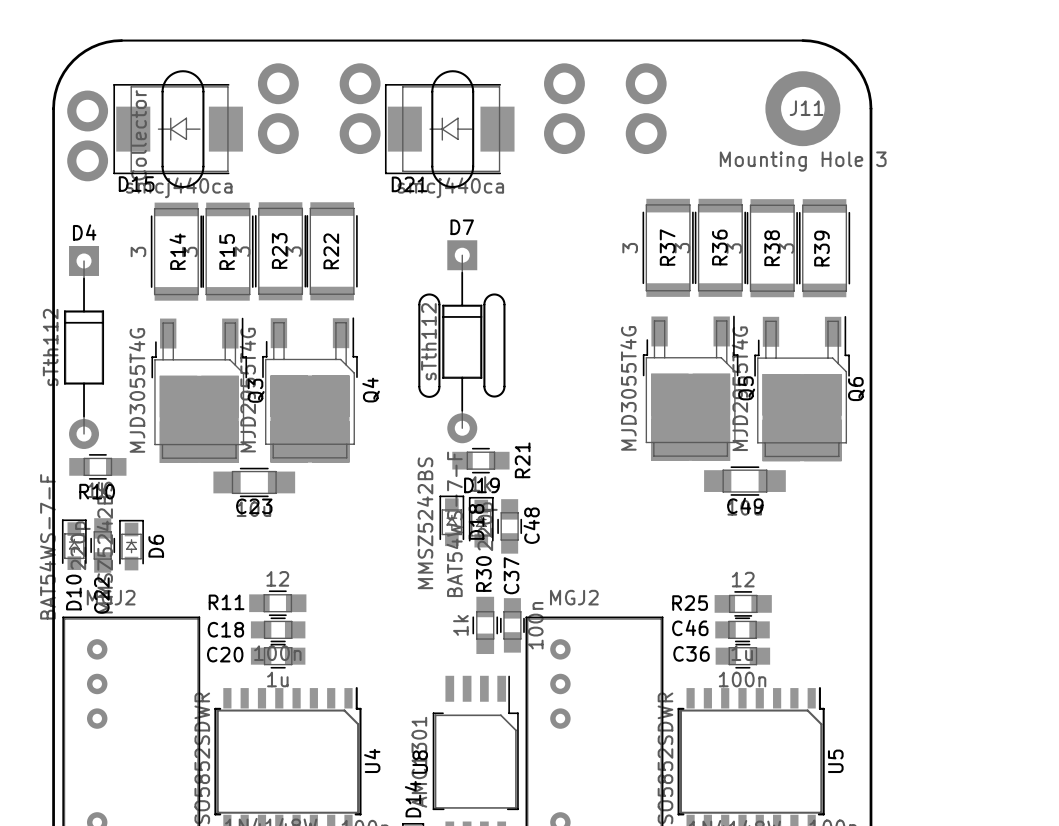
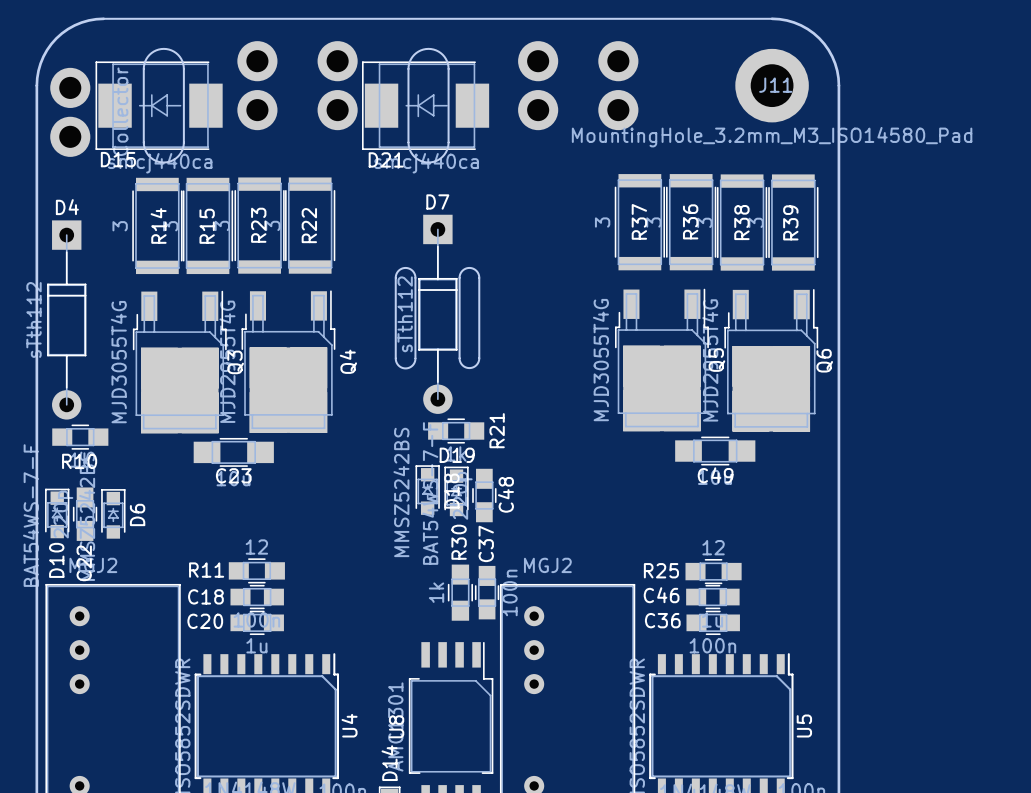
J11 value: Mounting Hole 3 (803, 161) -> MountingHole_3.2mm_M3_ISO14580_Pad (772, 137)

